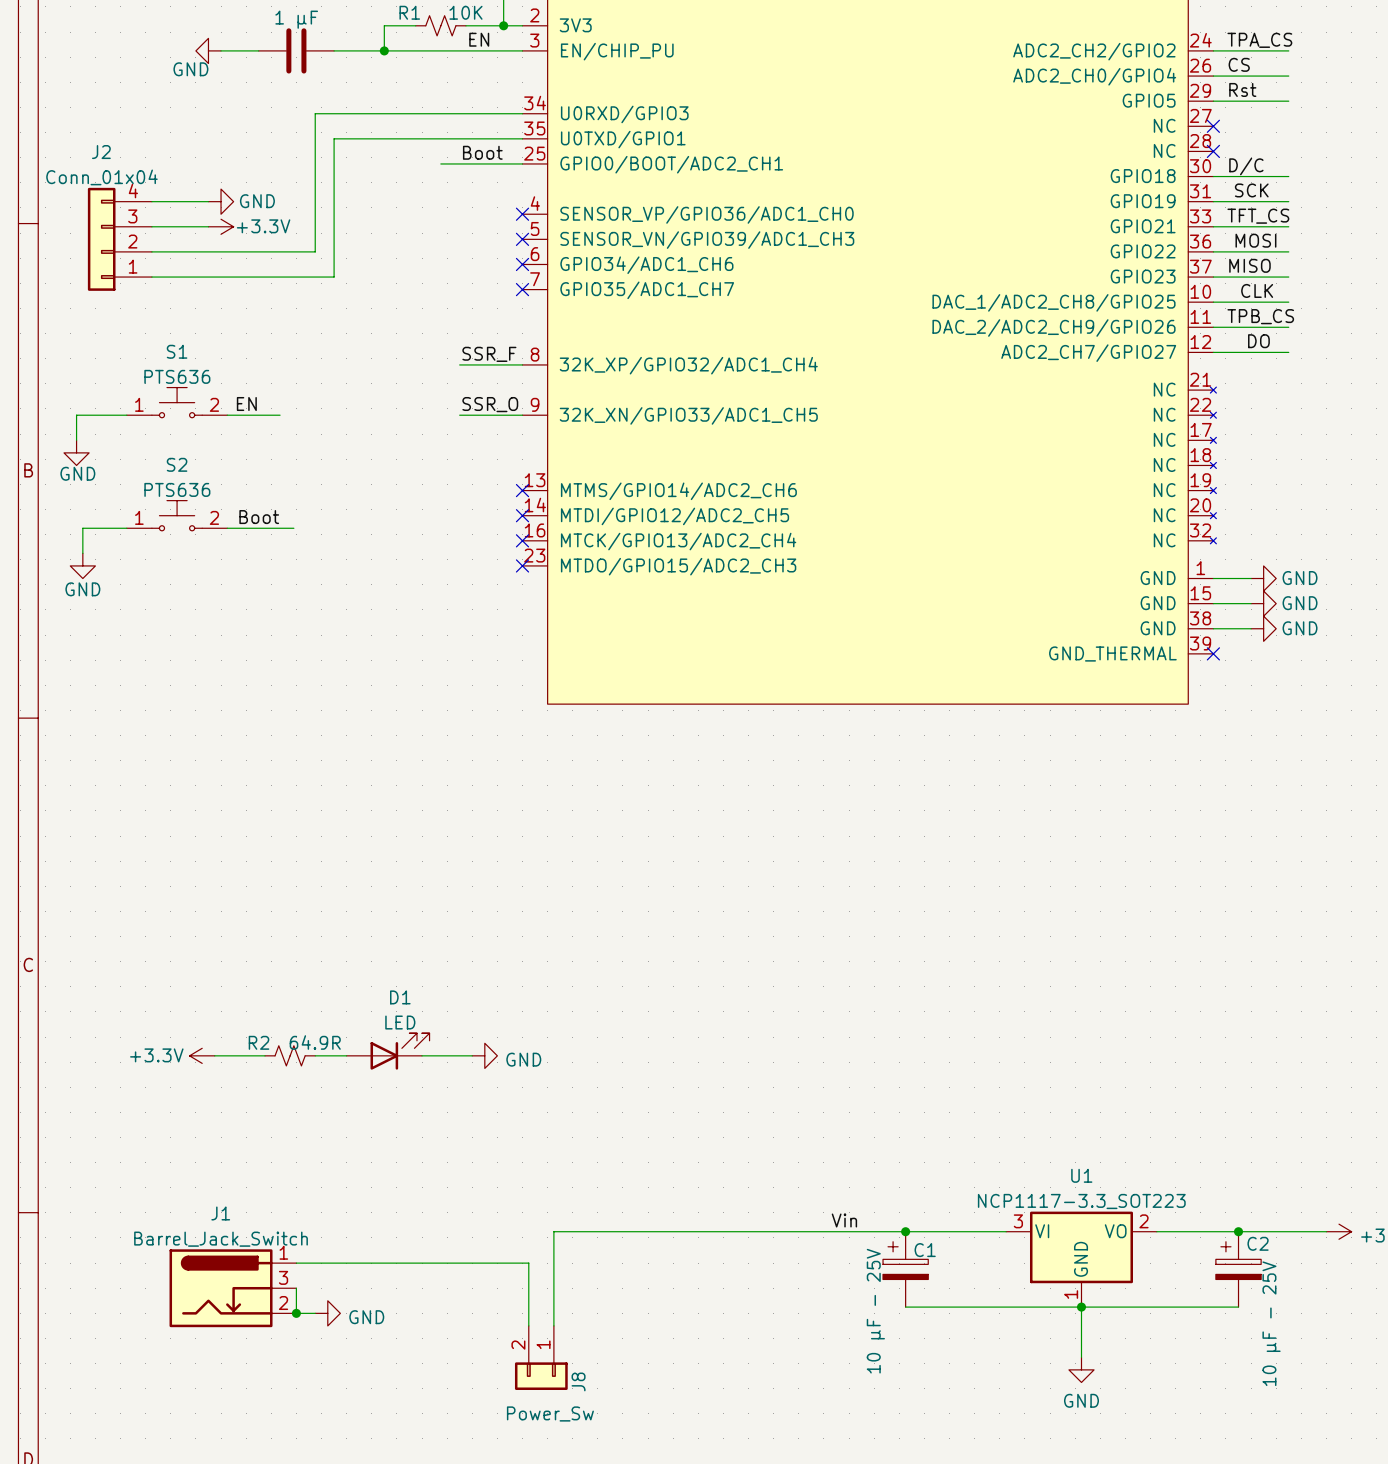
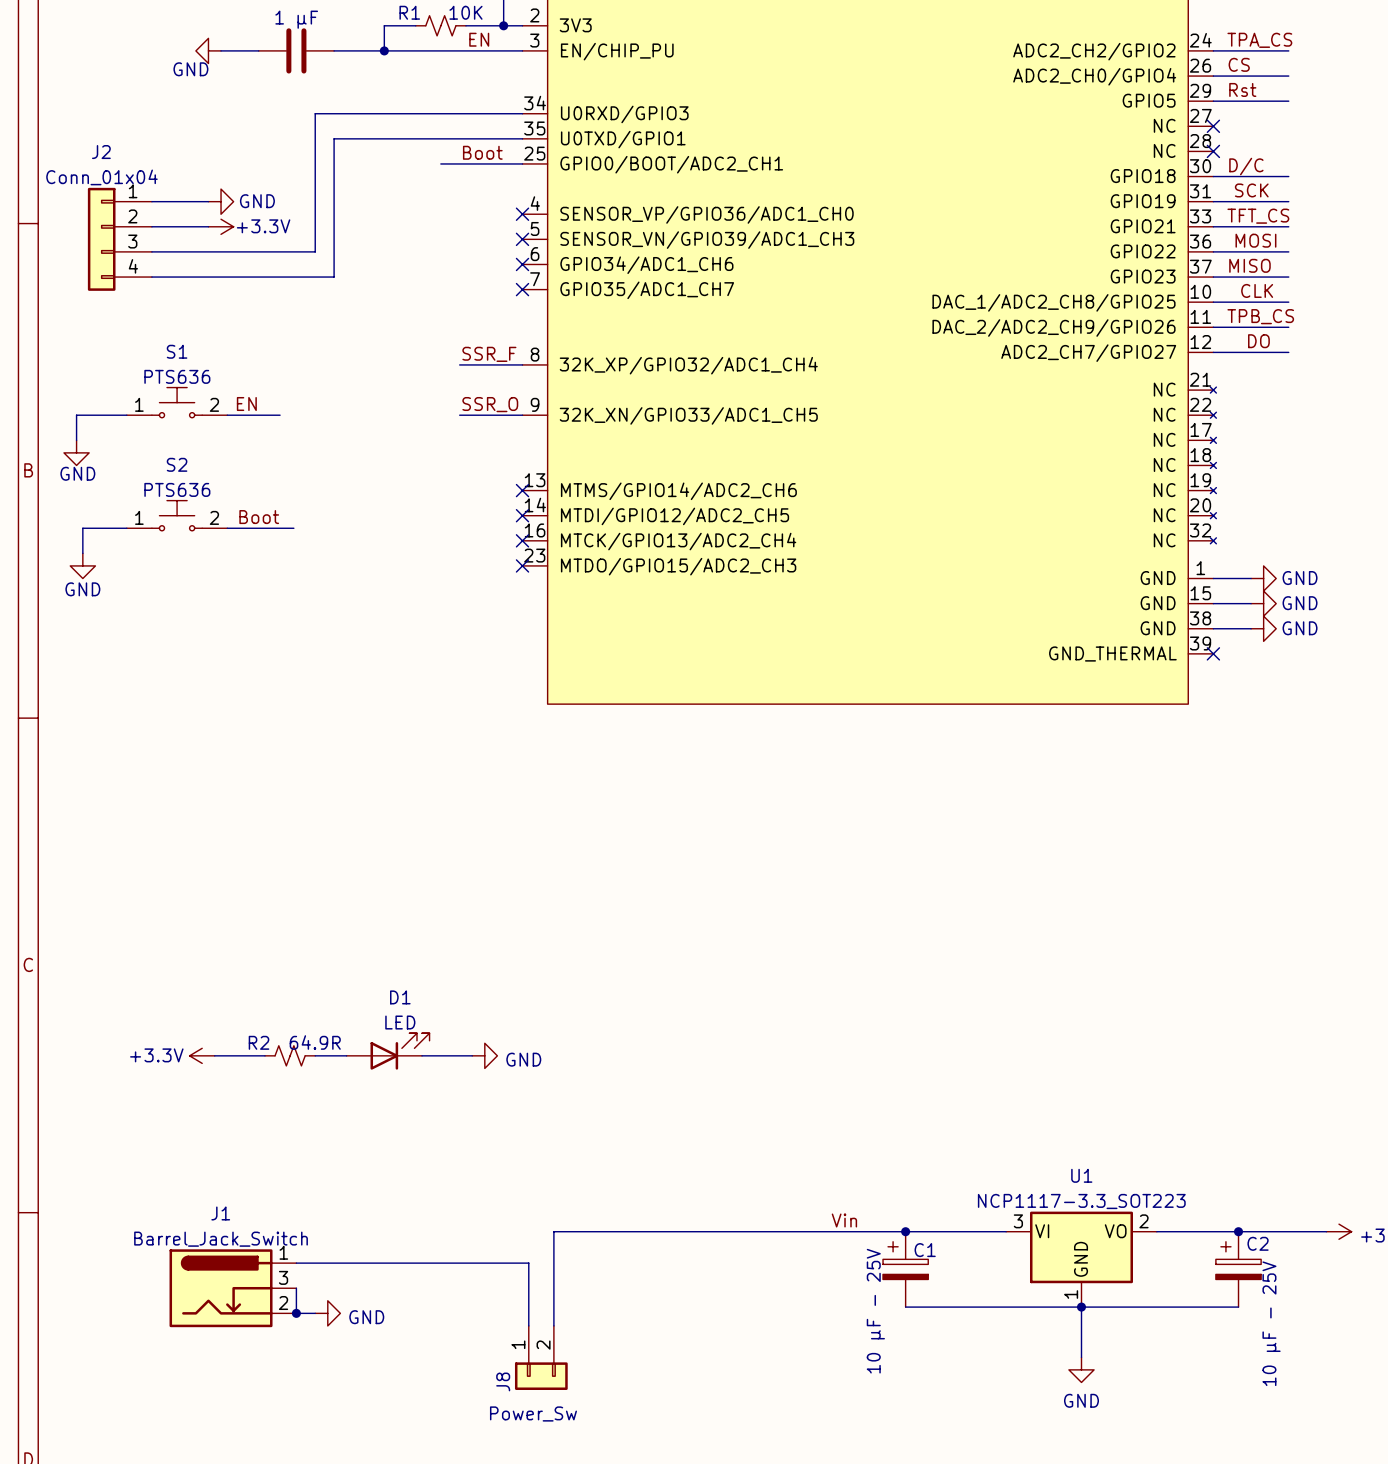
J2 flip: as is (101, 239) -> up-down (101, 239)
J8 flip: as is (541, 1376) -> left-right (541, 1376)

